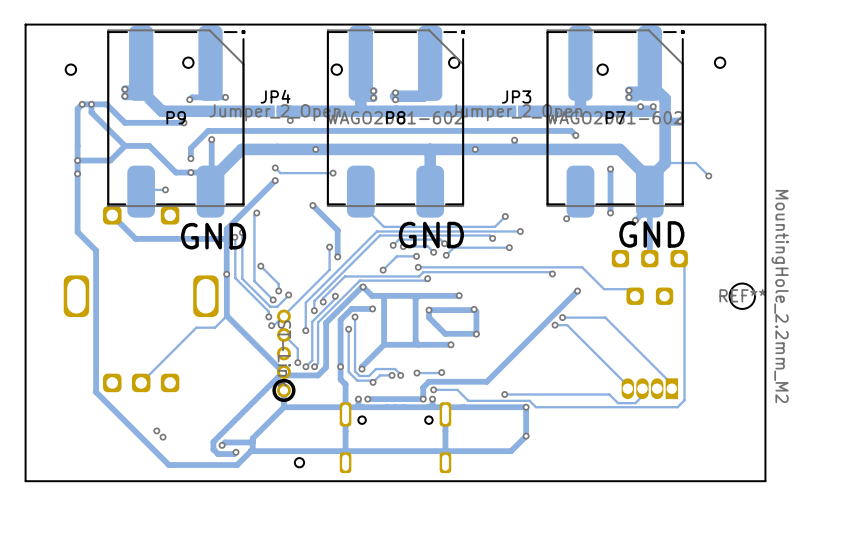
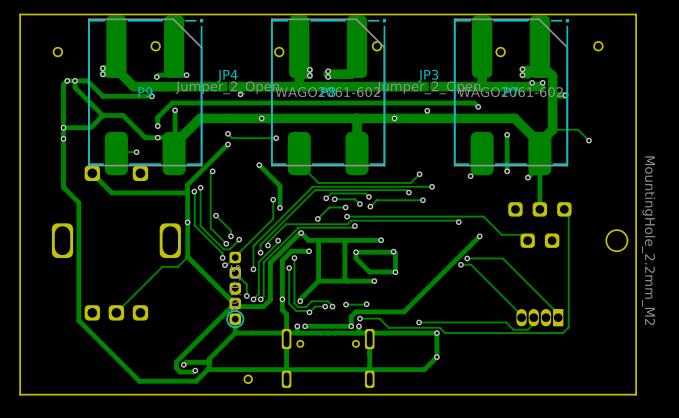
text: GND (651, 234) -> none
text: GND (431, 235) -> none
text: GND (213, 236) -> none
REF** name: REF** (742, 295) -> none
part footprint: [272, 309, 296, 403] -> [229, 251, 242, 325]
drawing: none -> [226, 310, 245, 329]
via: (156, 430) -> none
via: (163, 437) -> none

